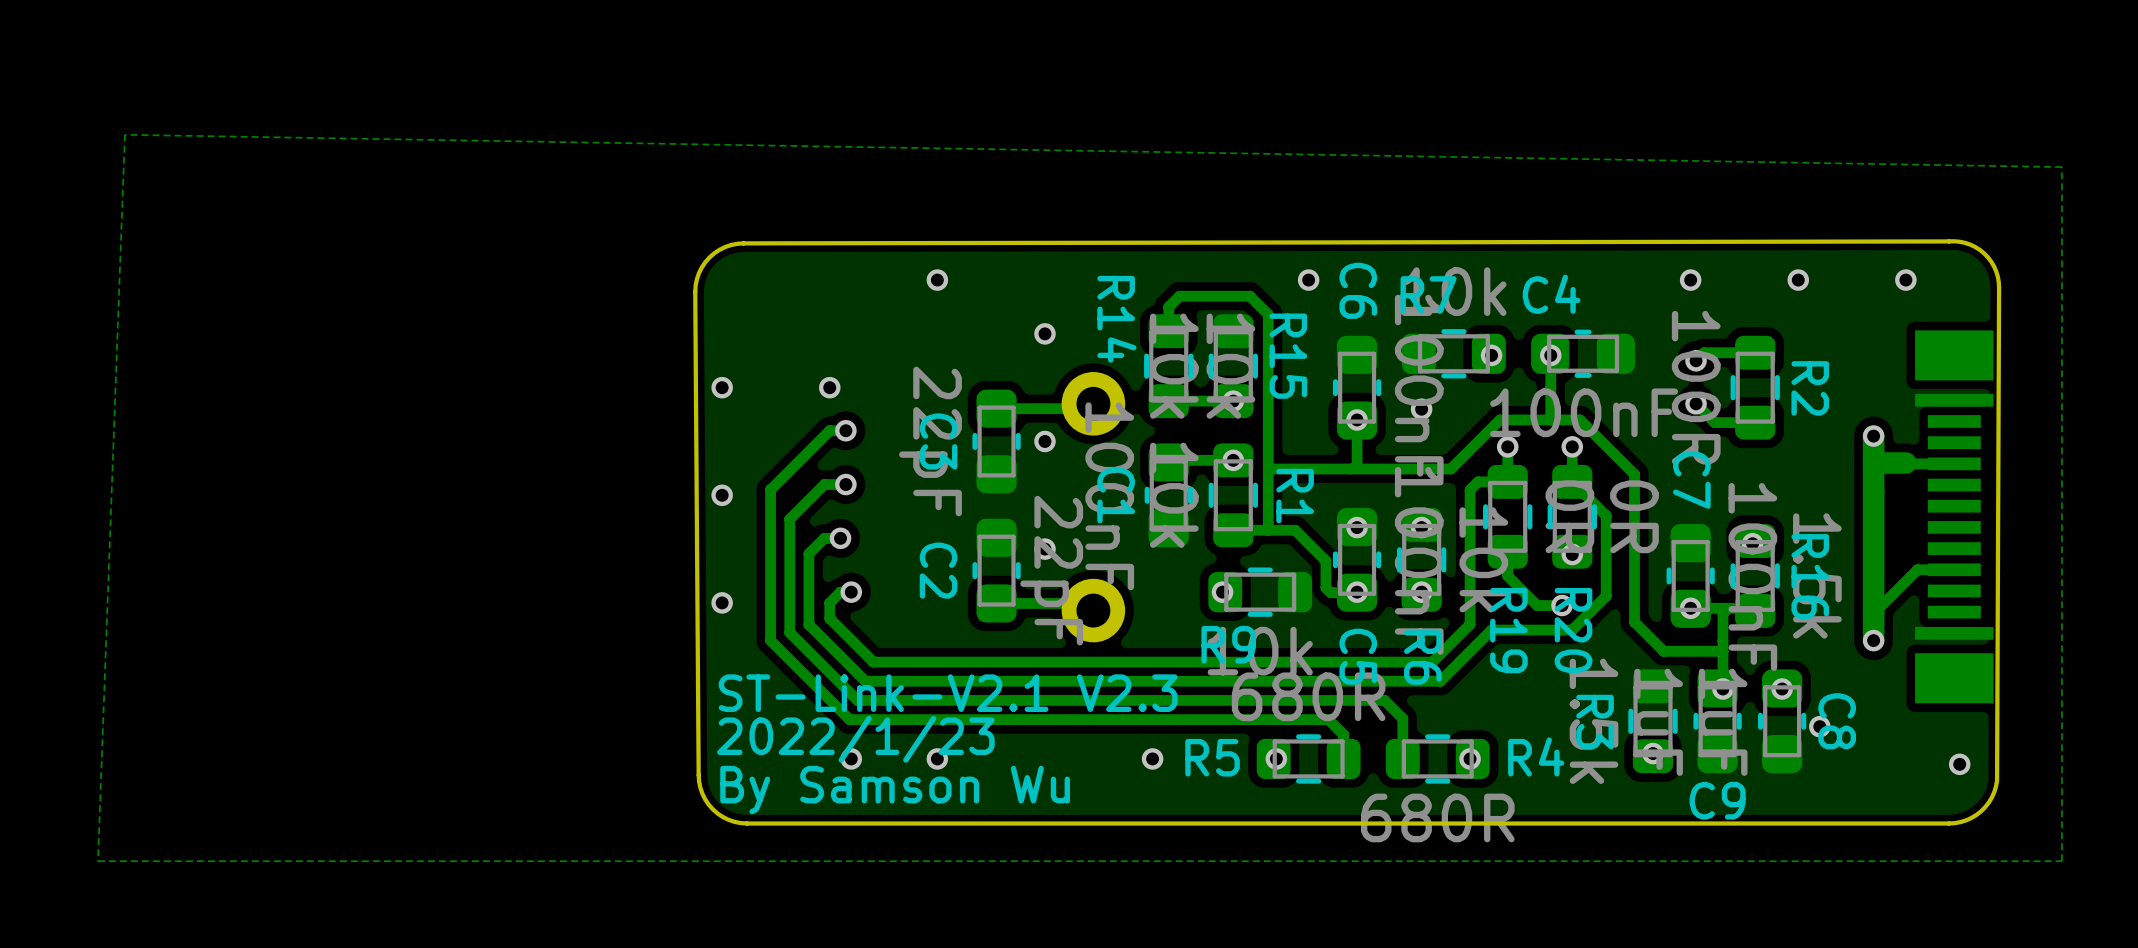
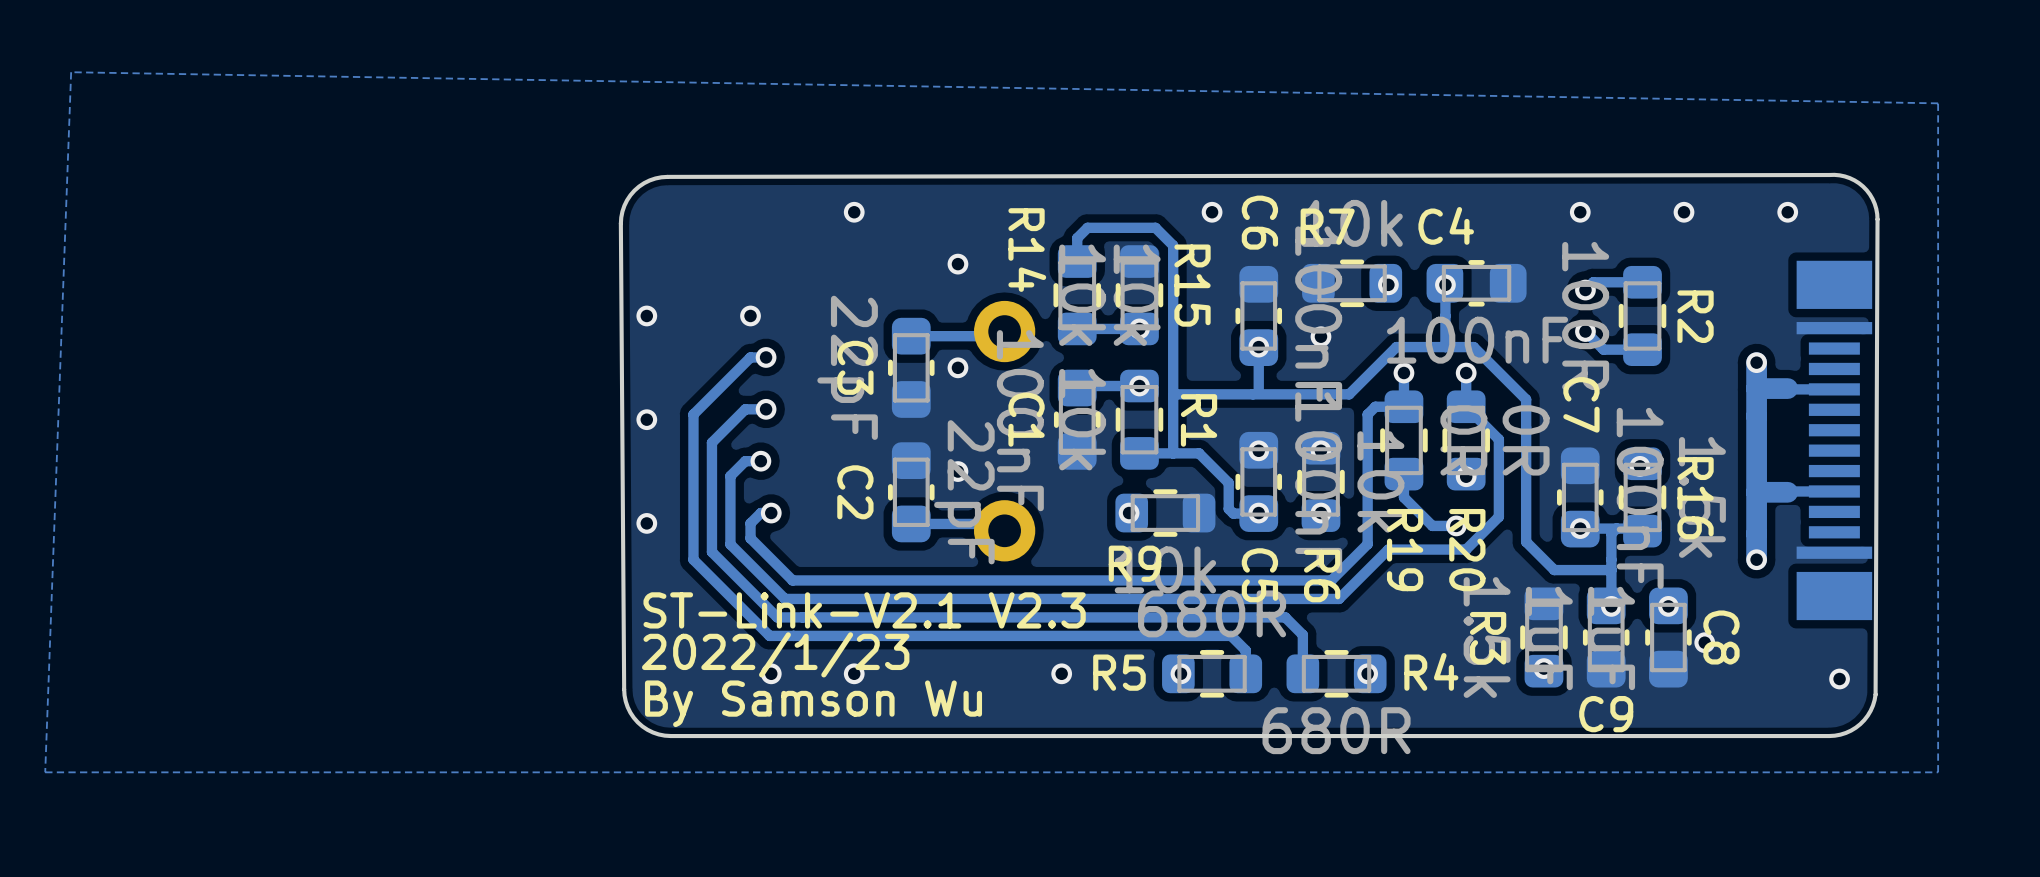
track: (1917, 569) (1873, 613) -> (1798, 491) (1757, 491)

